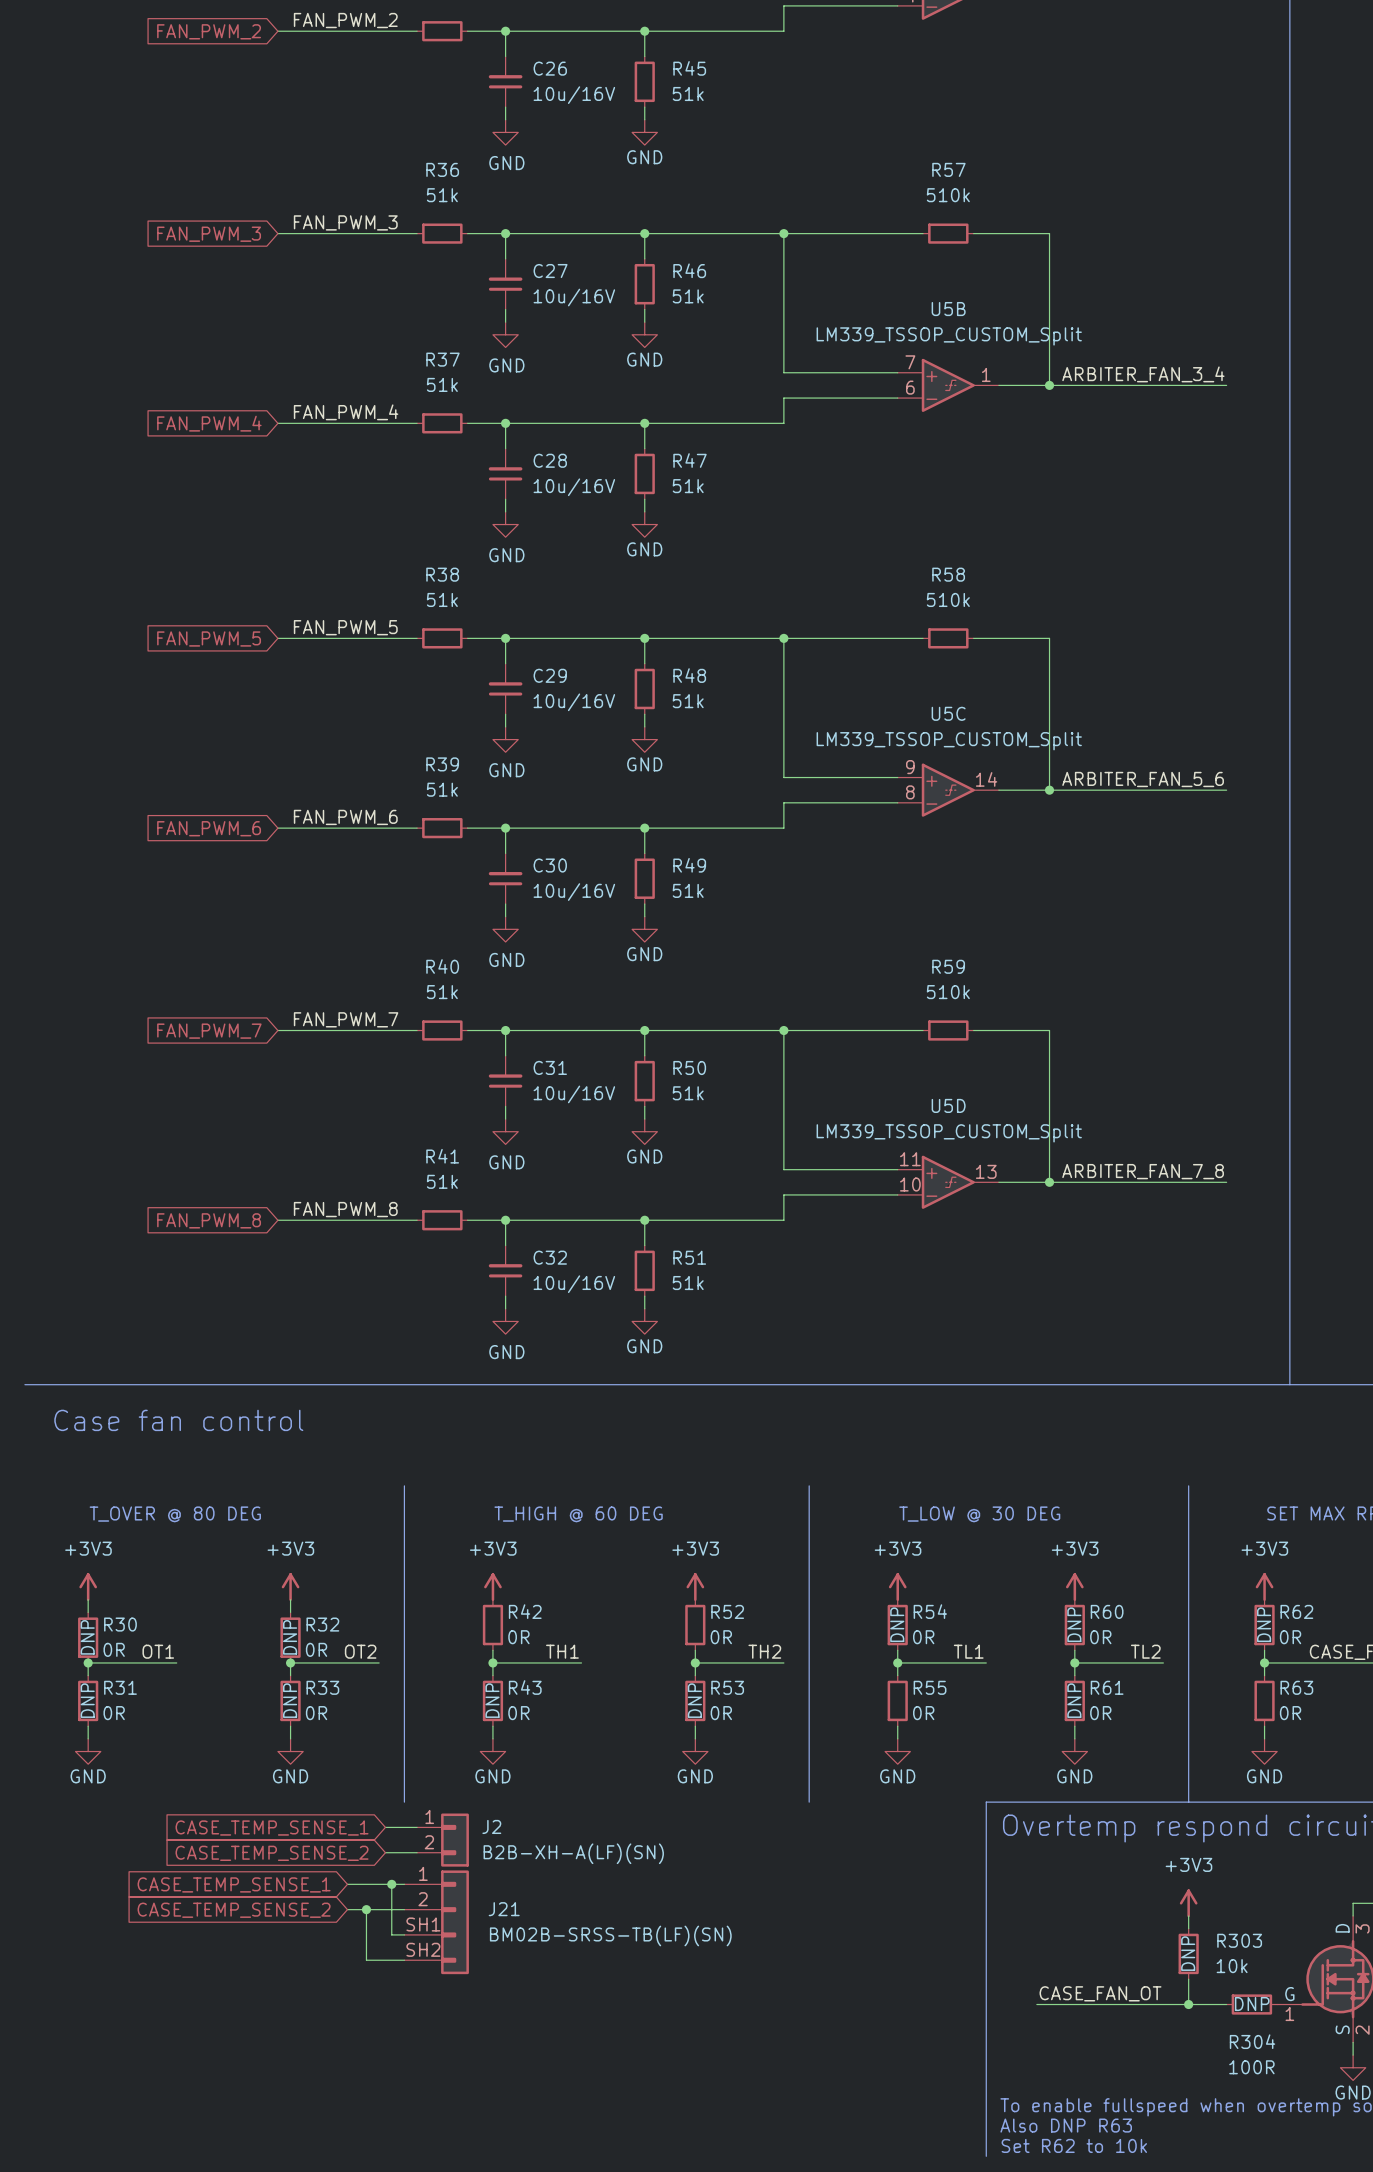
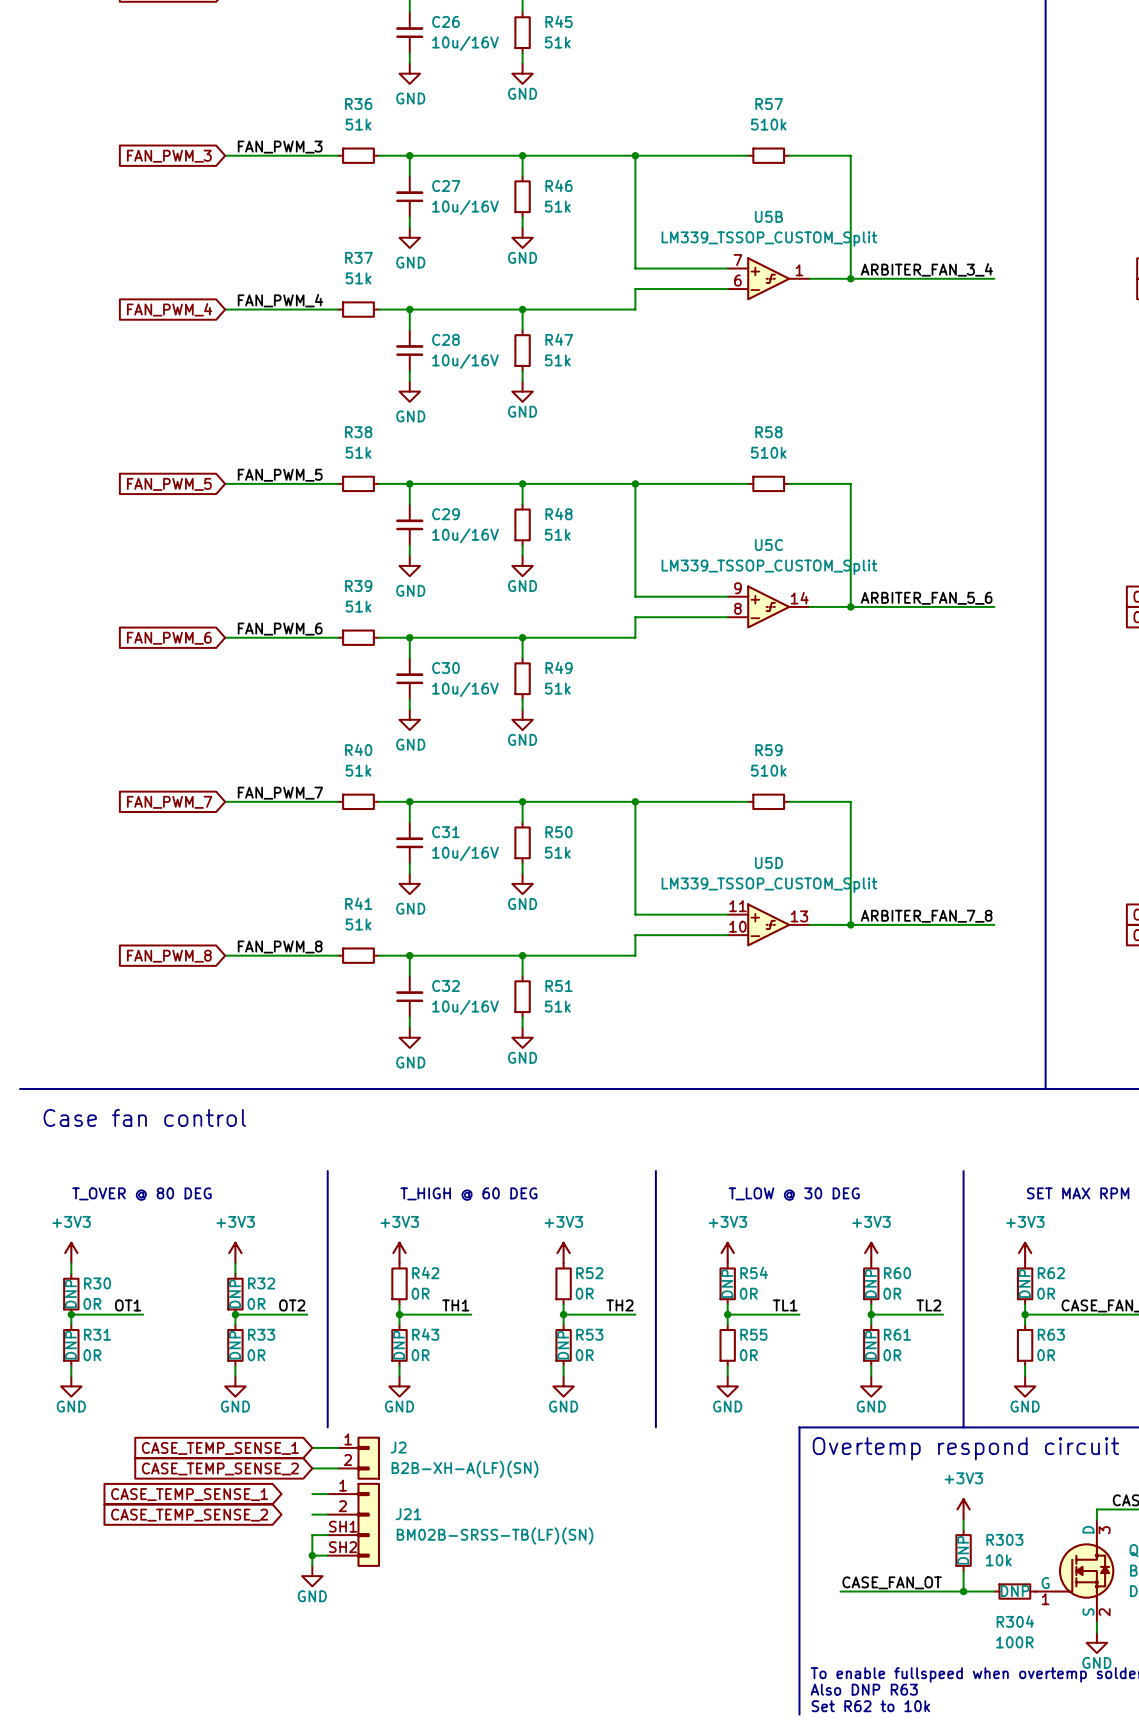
wire: (347, 1884) (385, 1884) -> none
wire: (391, 1884) (391, 1934) -> (312, 1565) (312, 1535) (317, 1535)
junction: (391, 1884) -> none
wire: (347, 1909) (385, 1909) -> none
wire: (366, 1909) (366, 1960) (385, 1960) -> none
junction: (366, 1909) -> none
junction: none -> (312, 1555)
power symbol: none -> GND (312, 1576)

